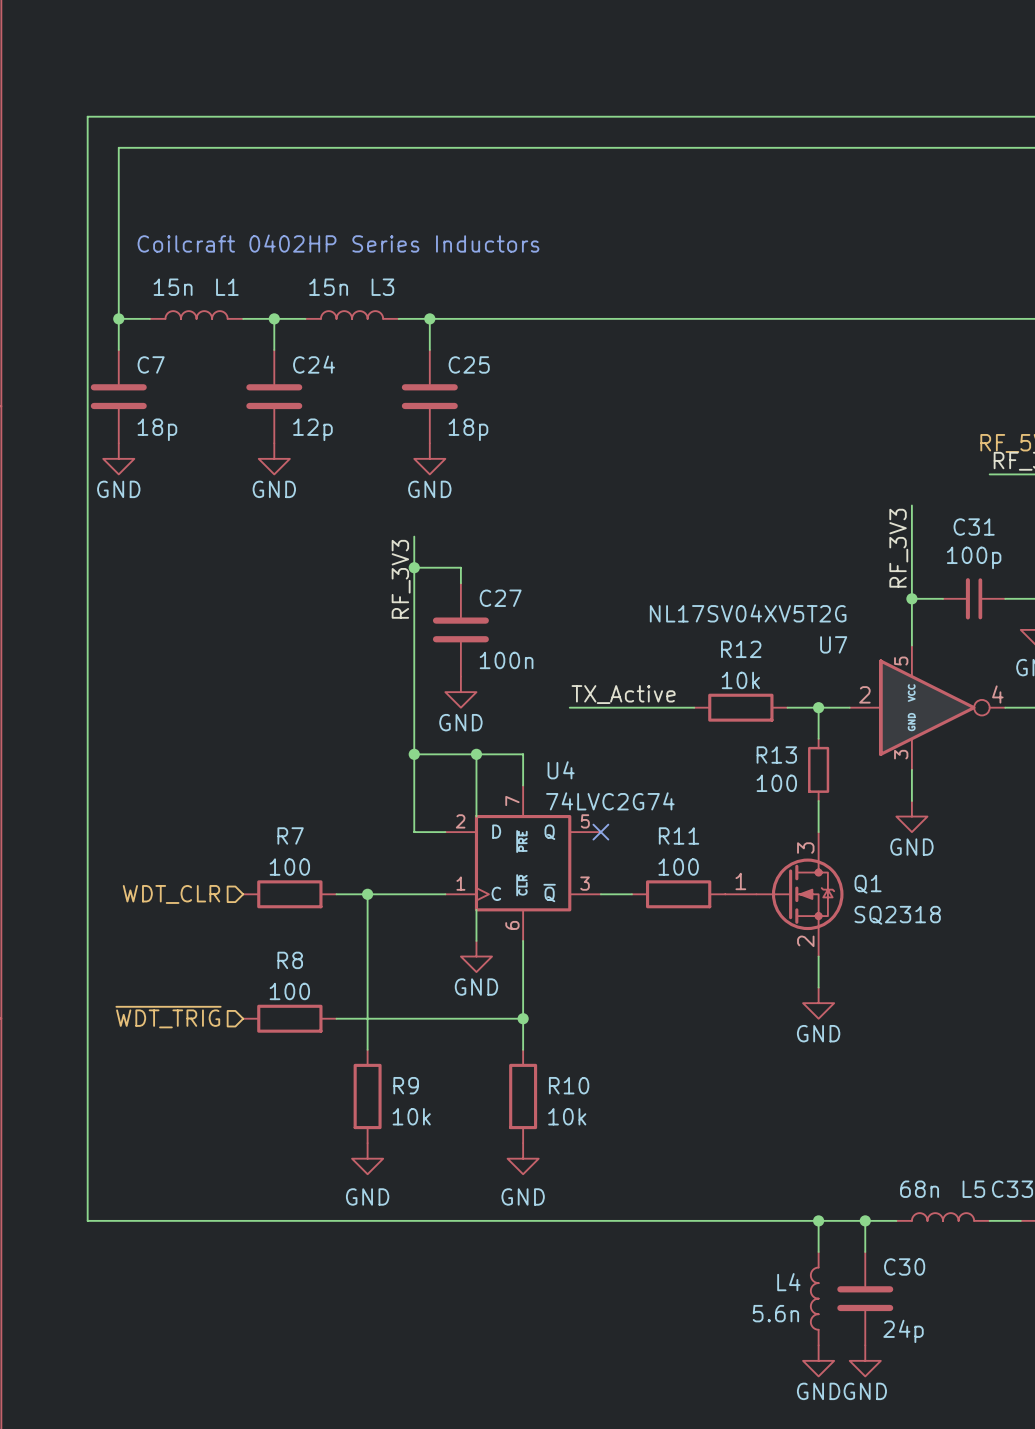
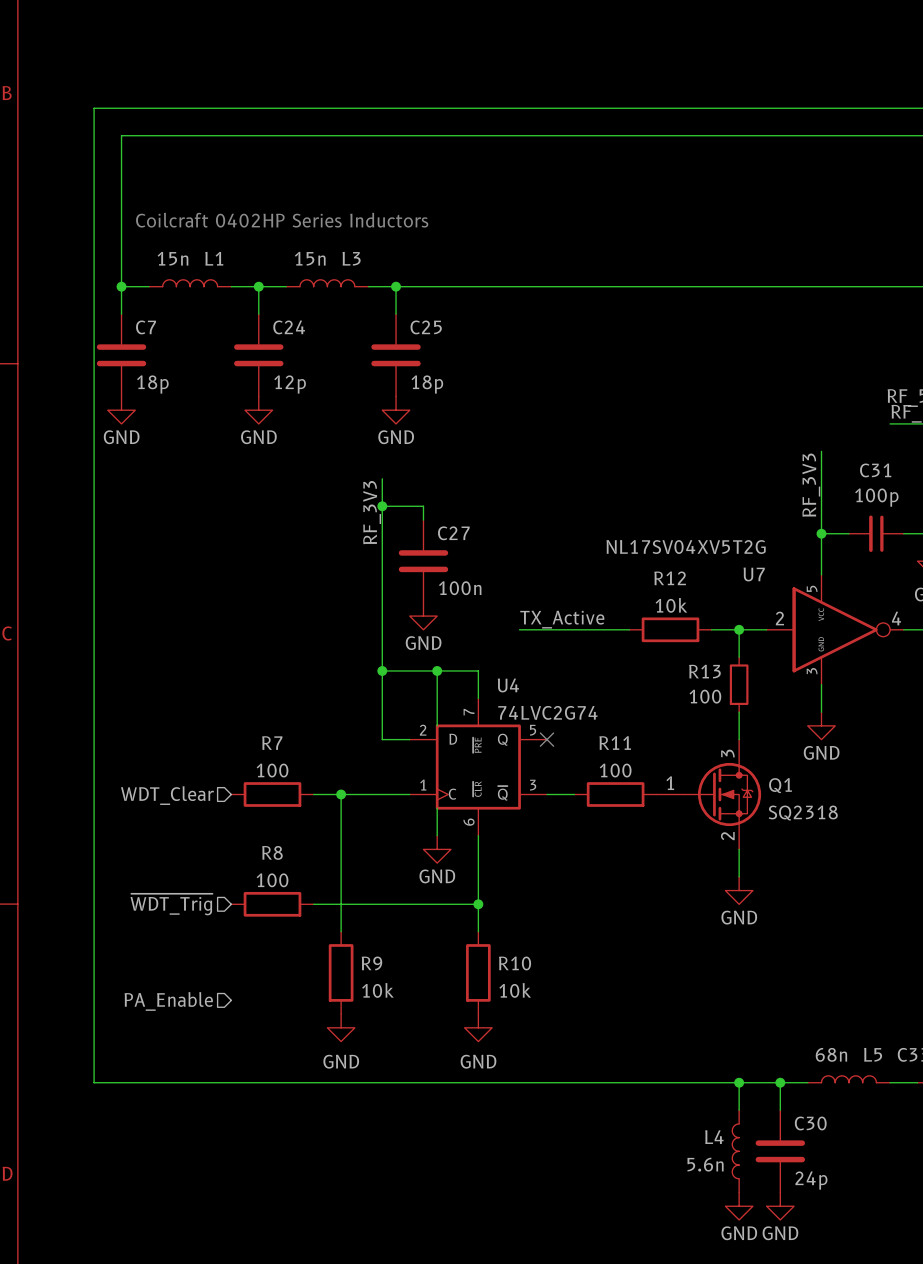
hierarchical label: WDT_CLR (171, 894) -> WDT_Clear (167, 795)
hierarchical label: ~{WDT_TRIG} (168, 1017) -> ~{WDT_Trig} (171, 904)
hierarchical label: none -> PA_Enable (168, 1001)

